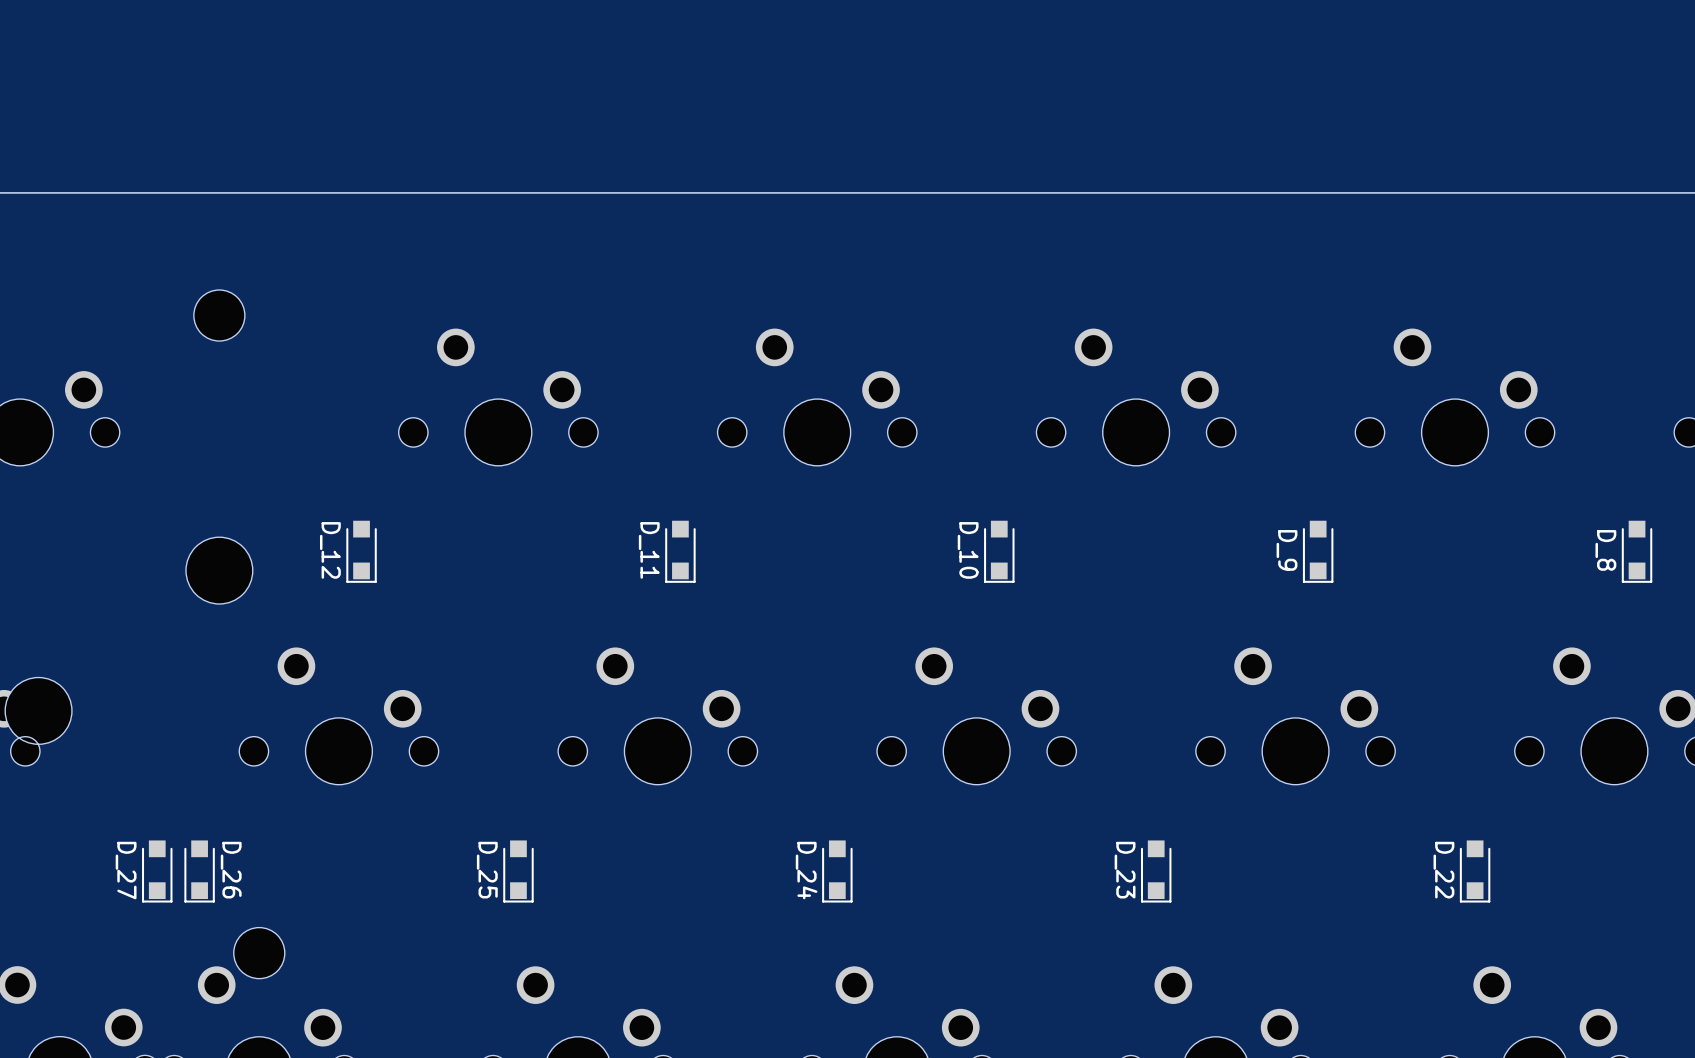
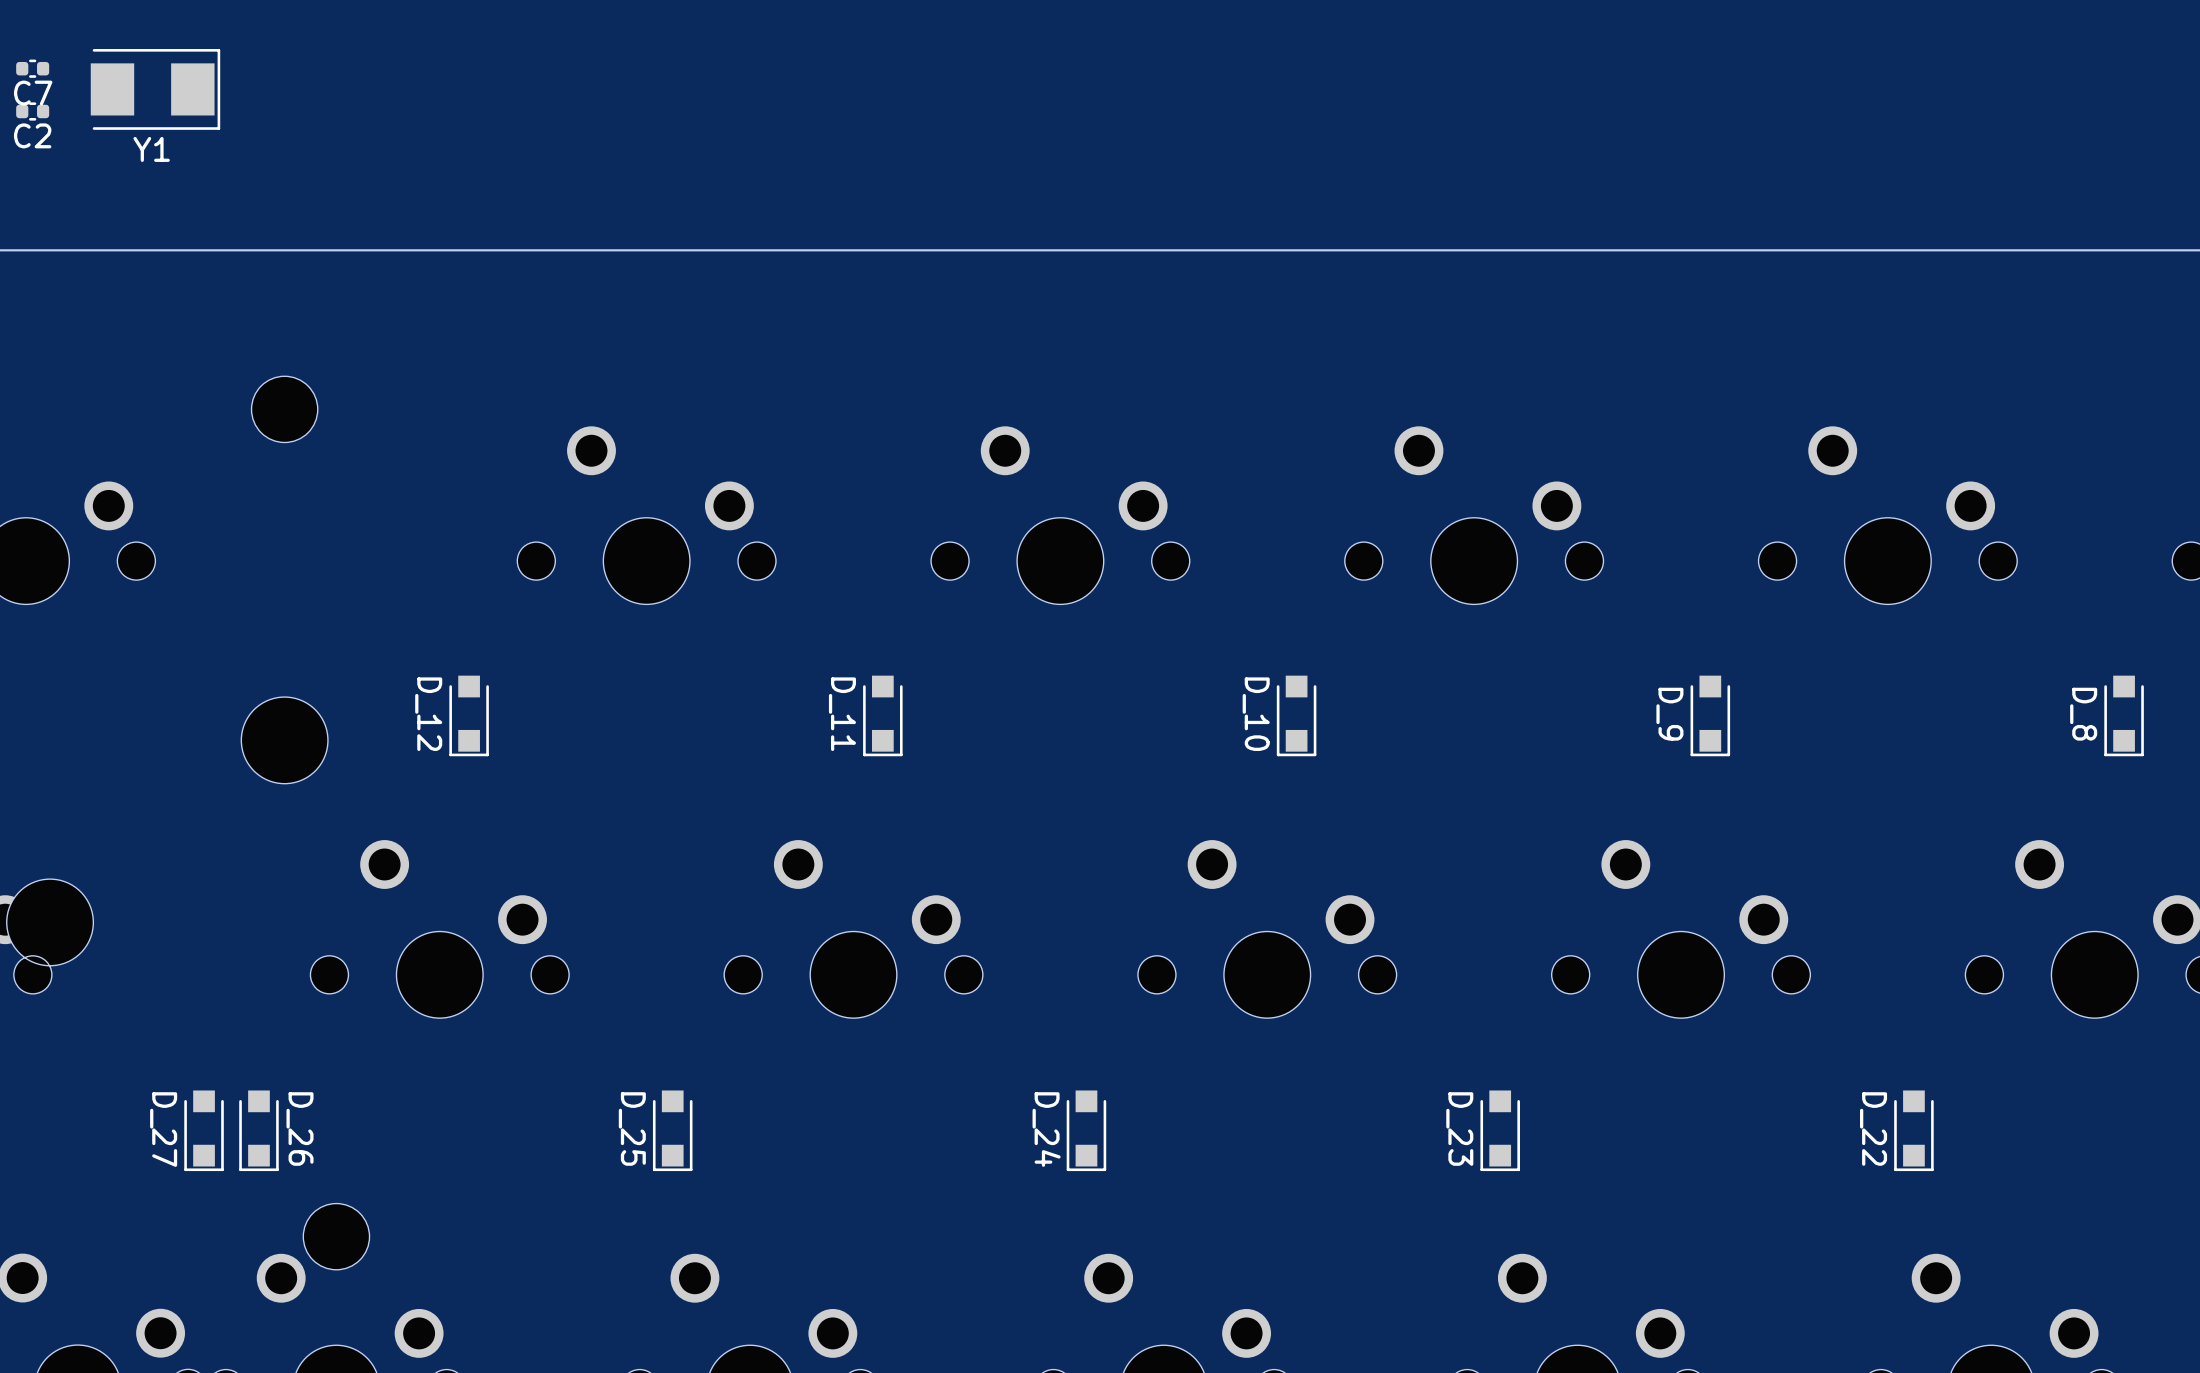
C7: none -> (32, 68)
Y1: none -> (155, 89)
C2: none -> (32, 111)

